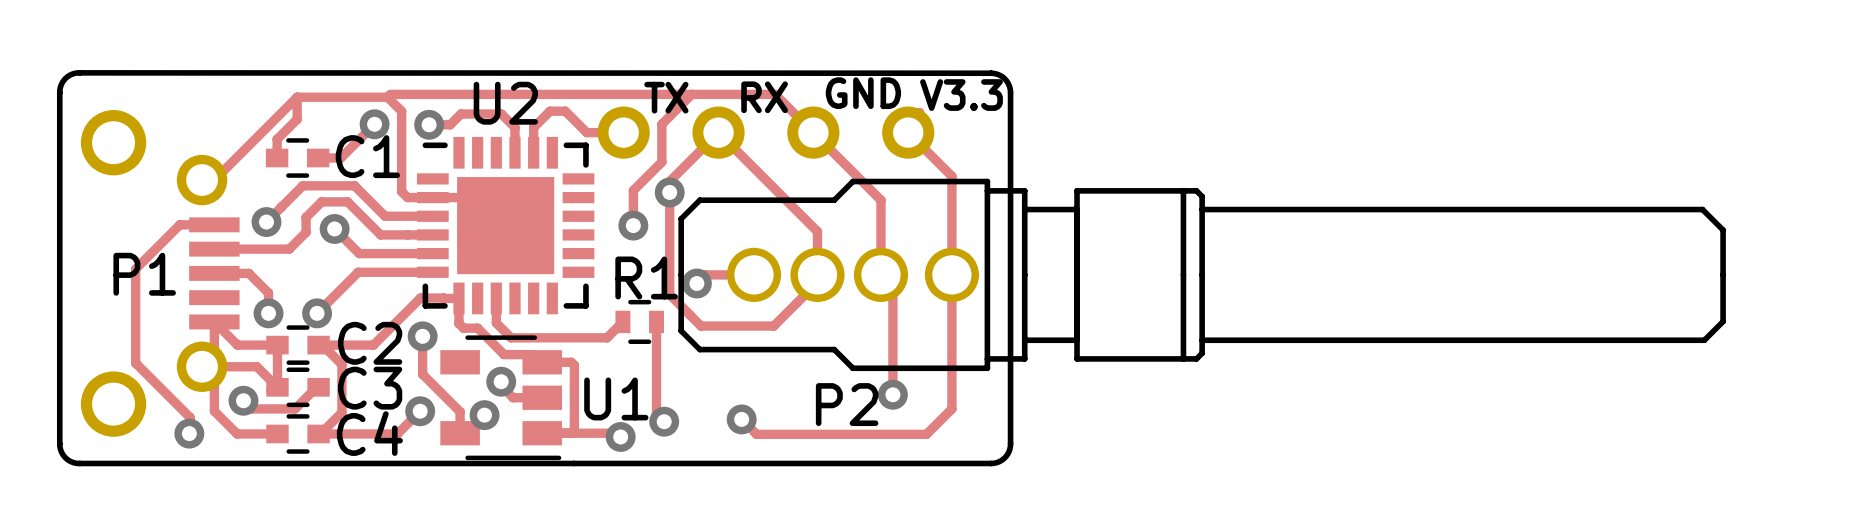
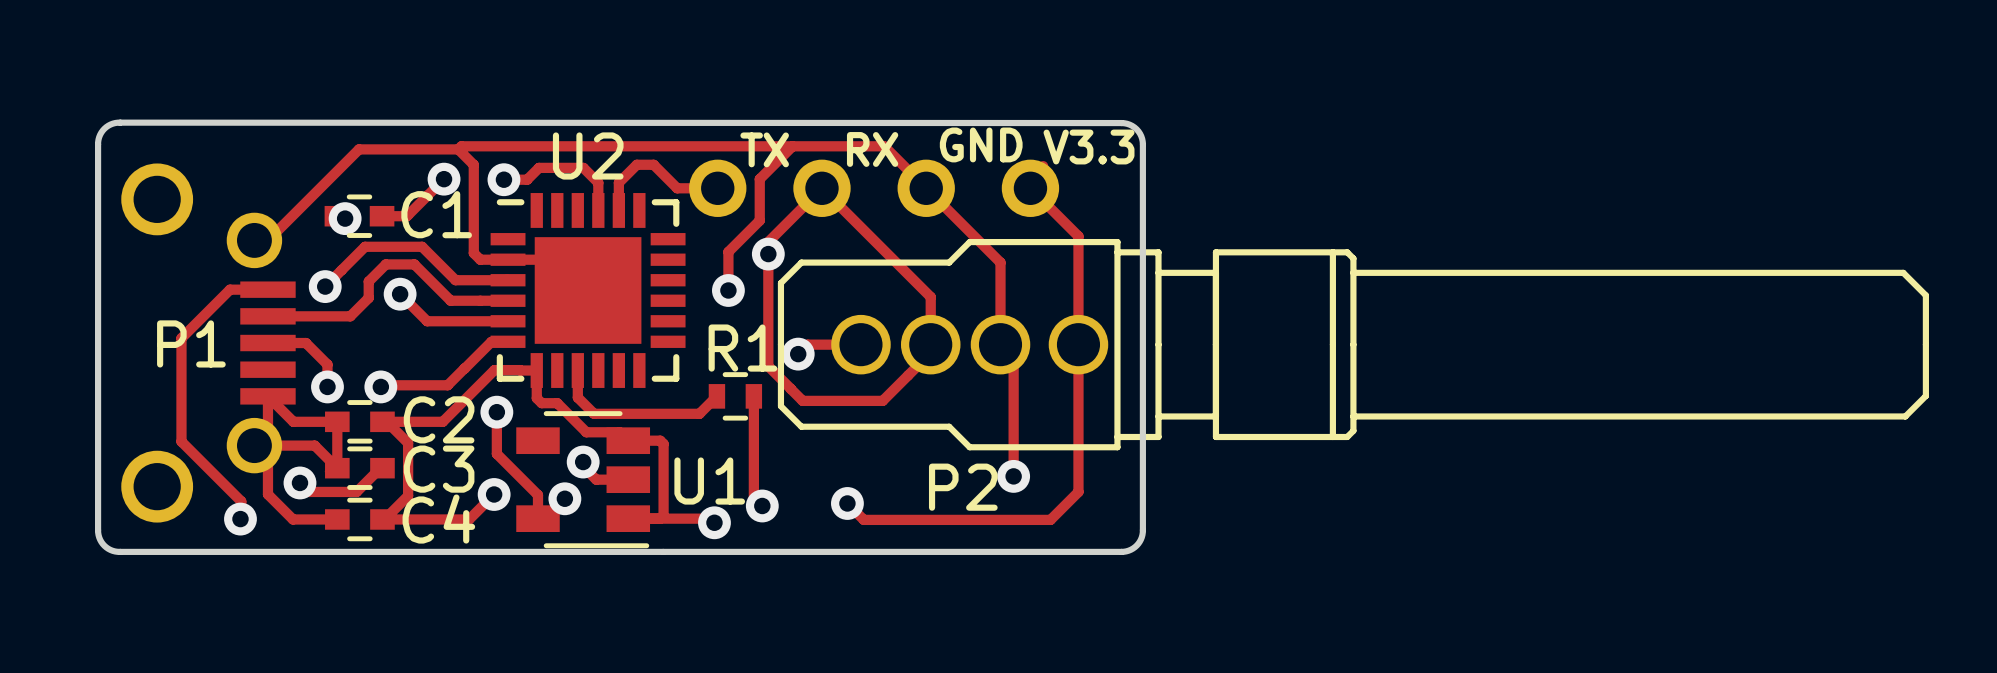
track: (297, 97) (297, 119) (277, 139) (277, 158) -> none
via: none -> (345, 218)
track: (417, 272) (358, 272) (317, 313) -> (491, 341) (464, 368)
track: none -> (464, 368) (447, 385) (377, 385)

